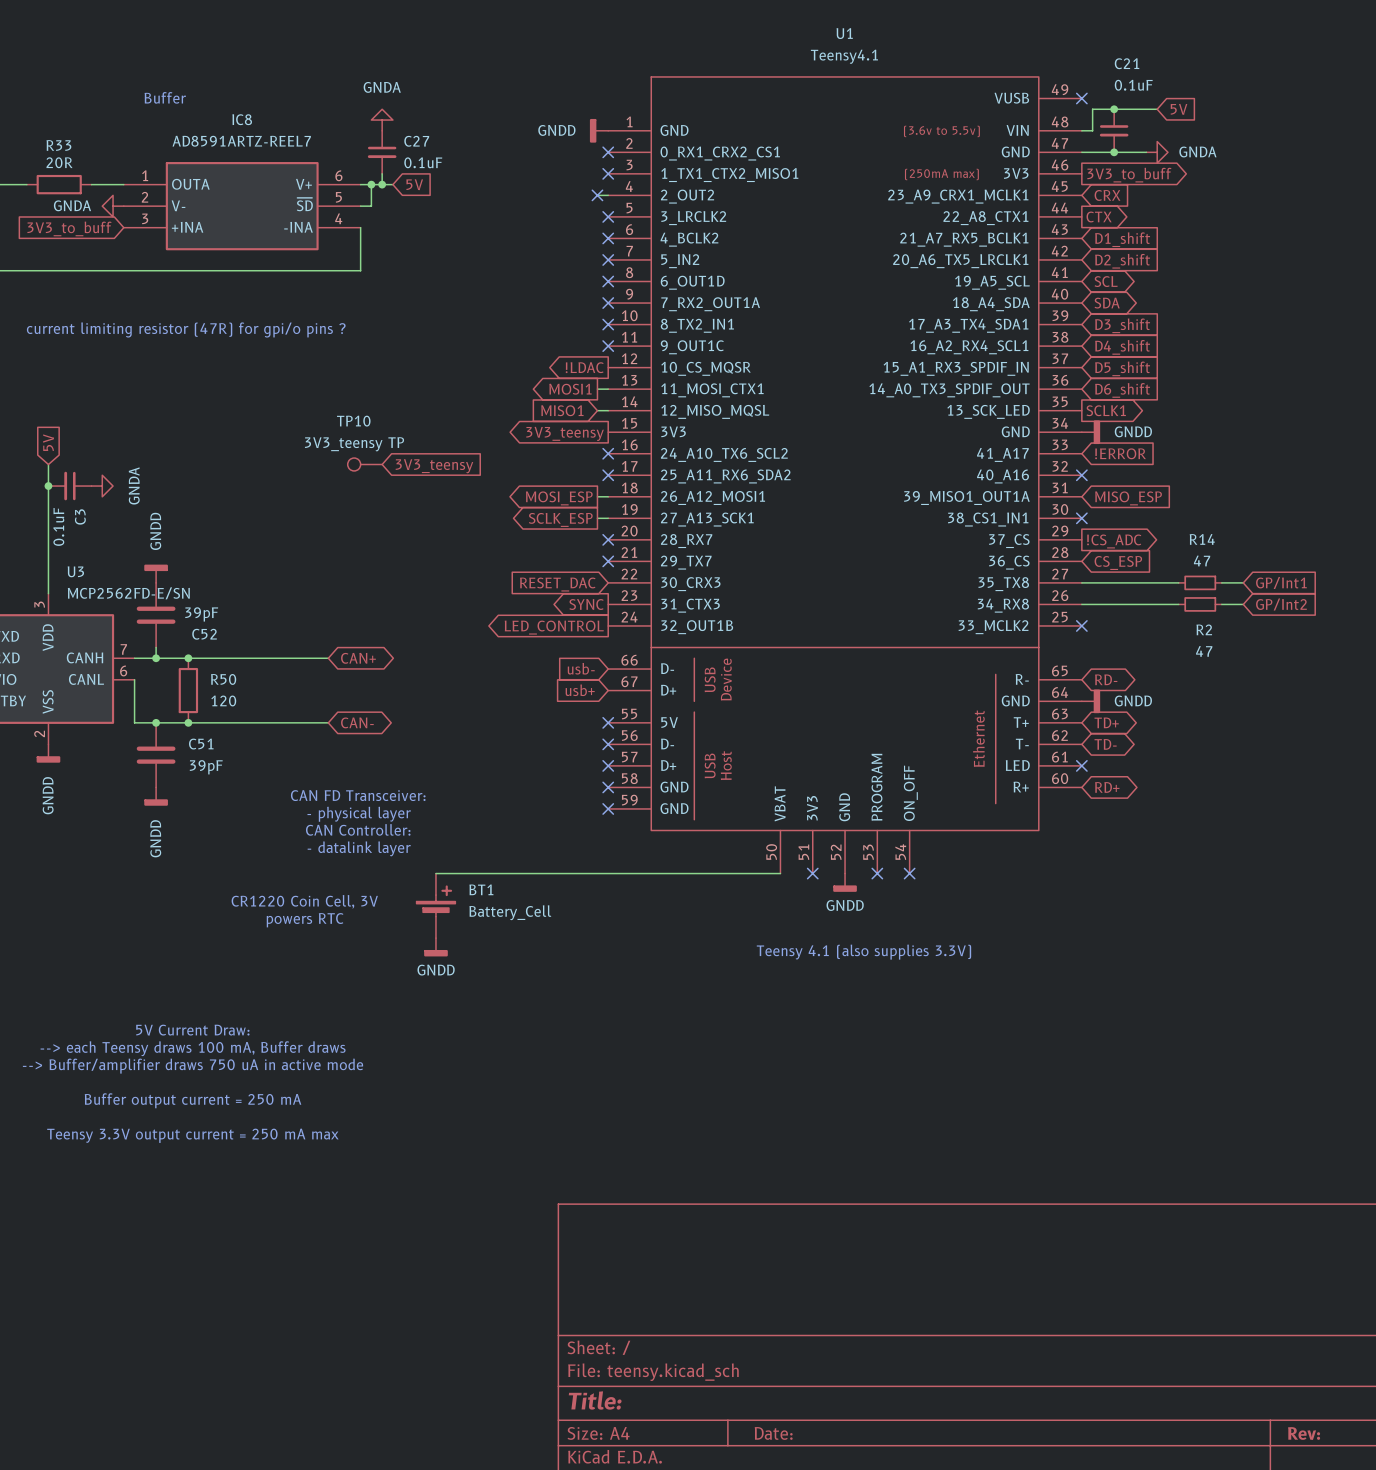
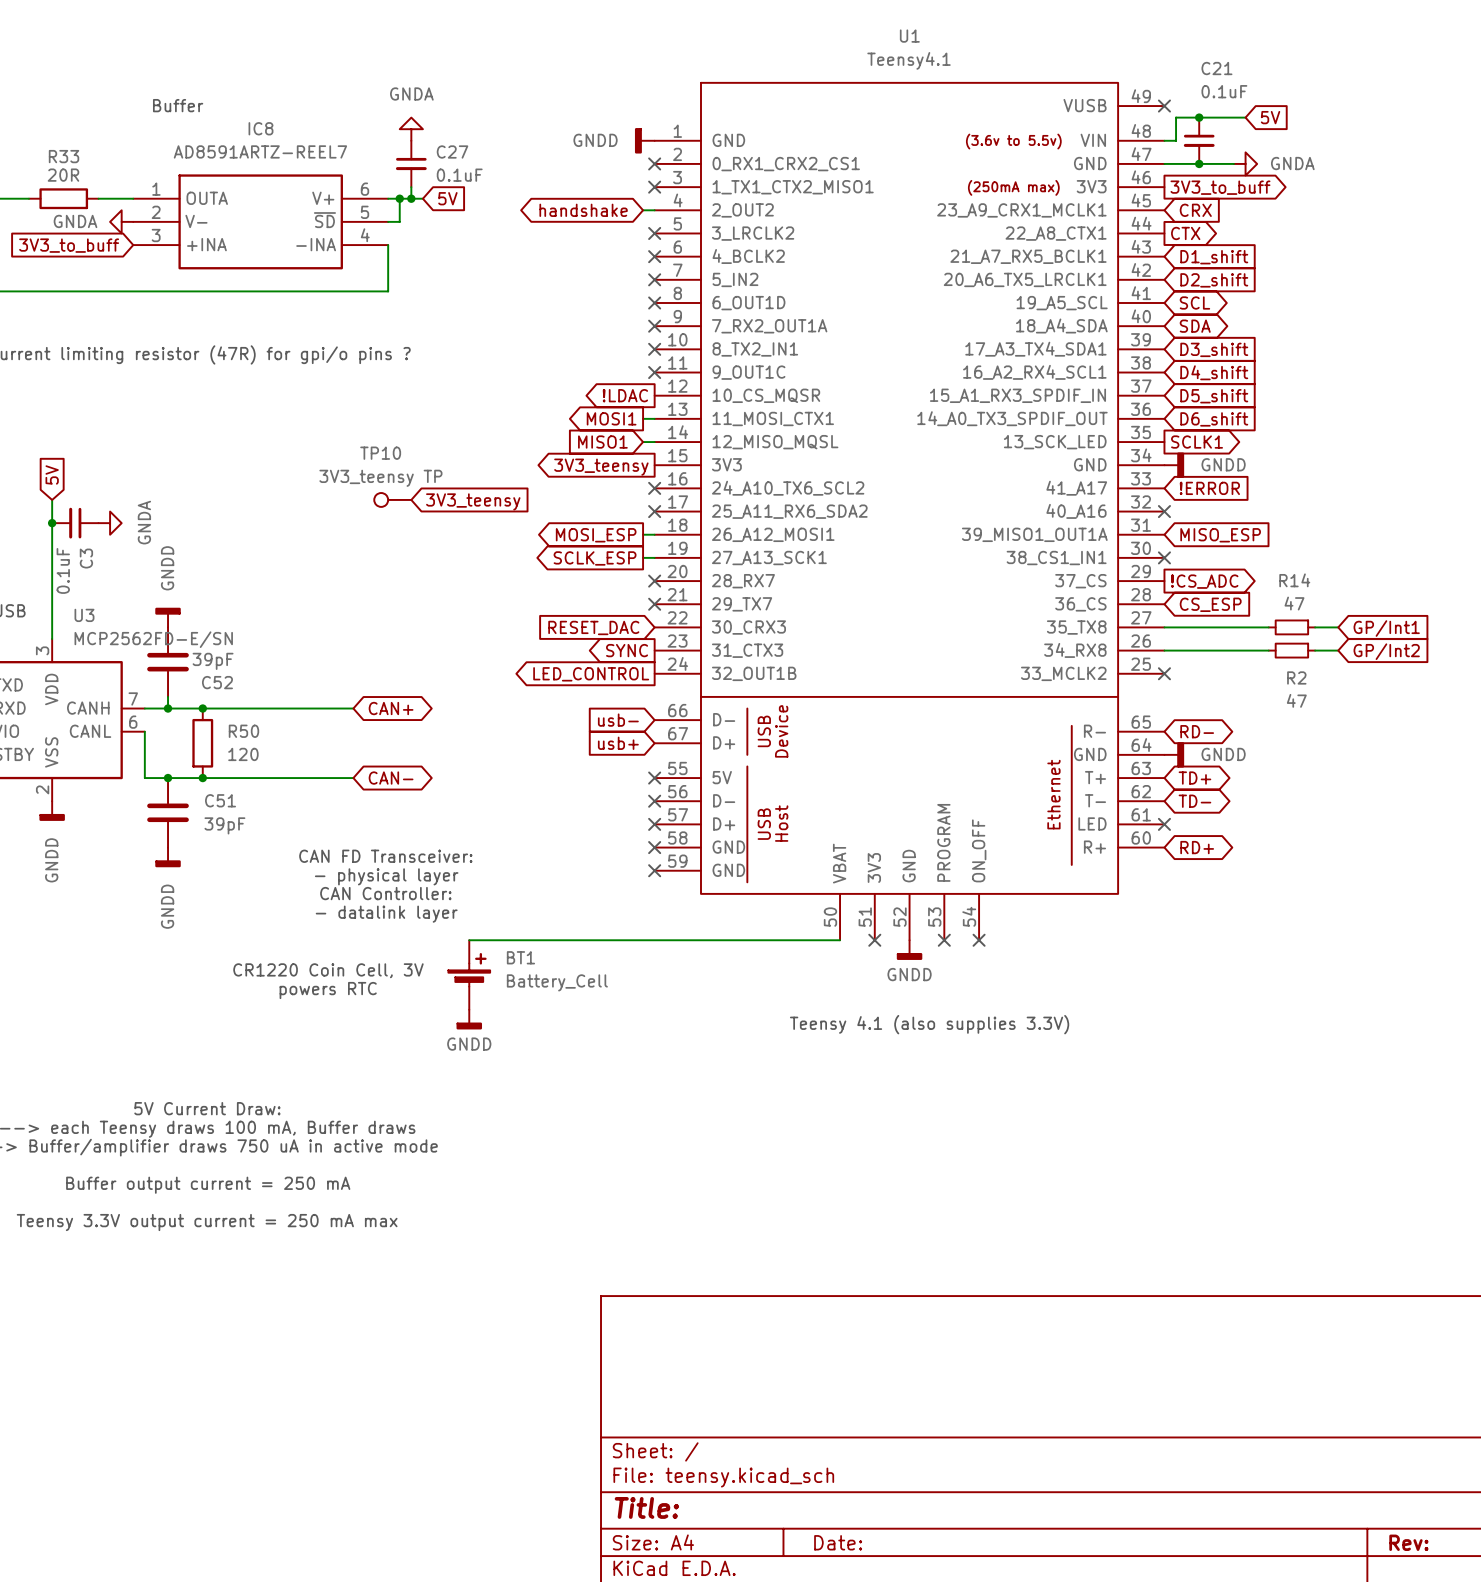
global label: none -> handshake (583, 210)
no-connect mark: (597, 195) -> none

